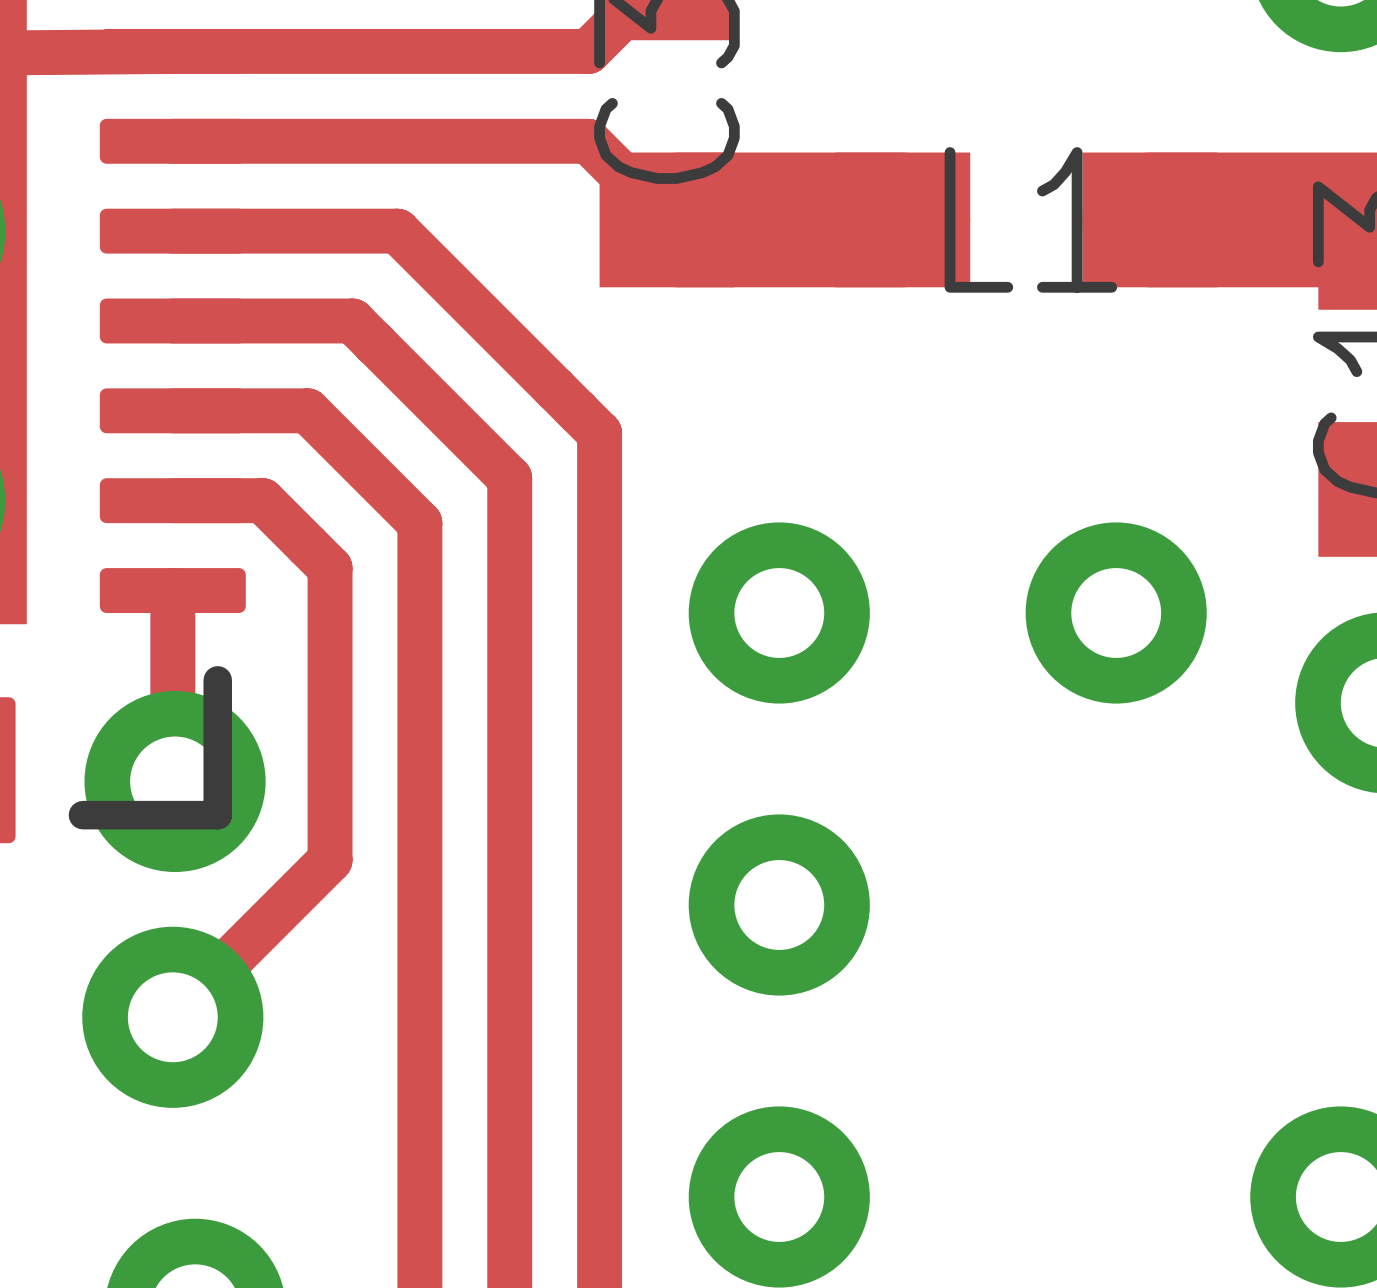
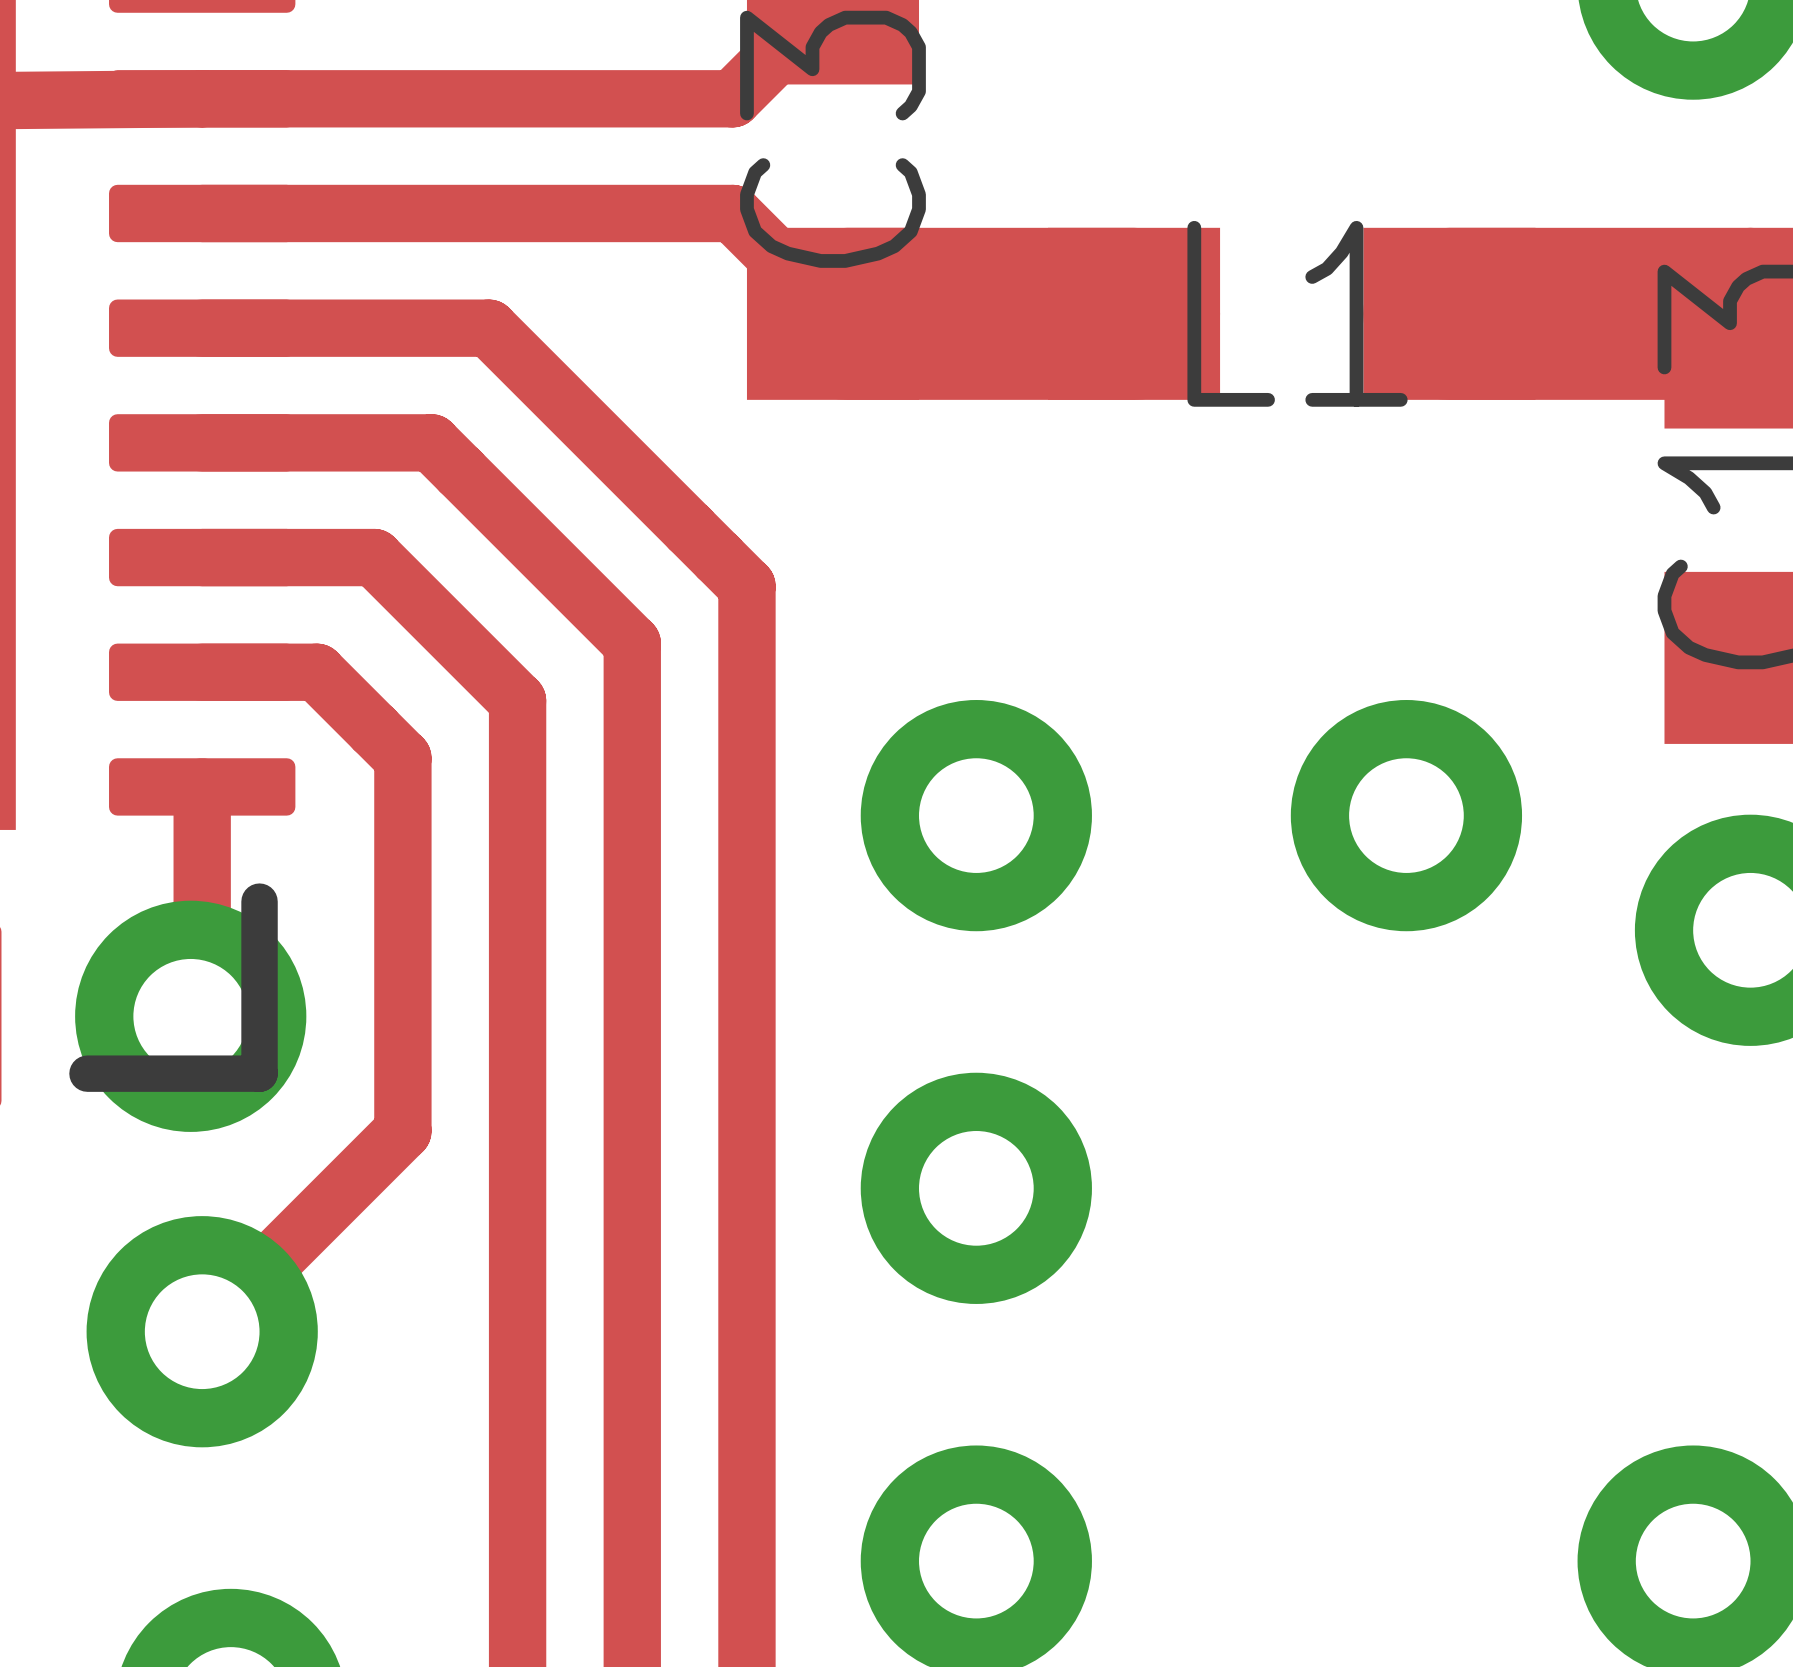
via position: (175, 781) -> (190, 1016)

